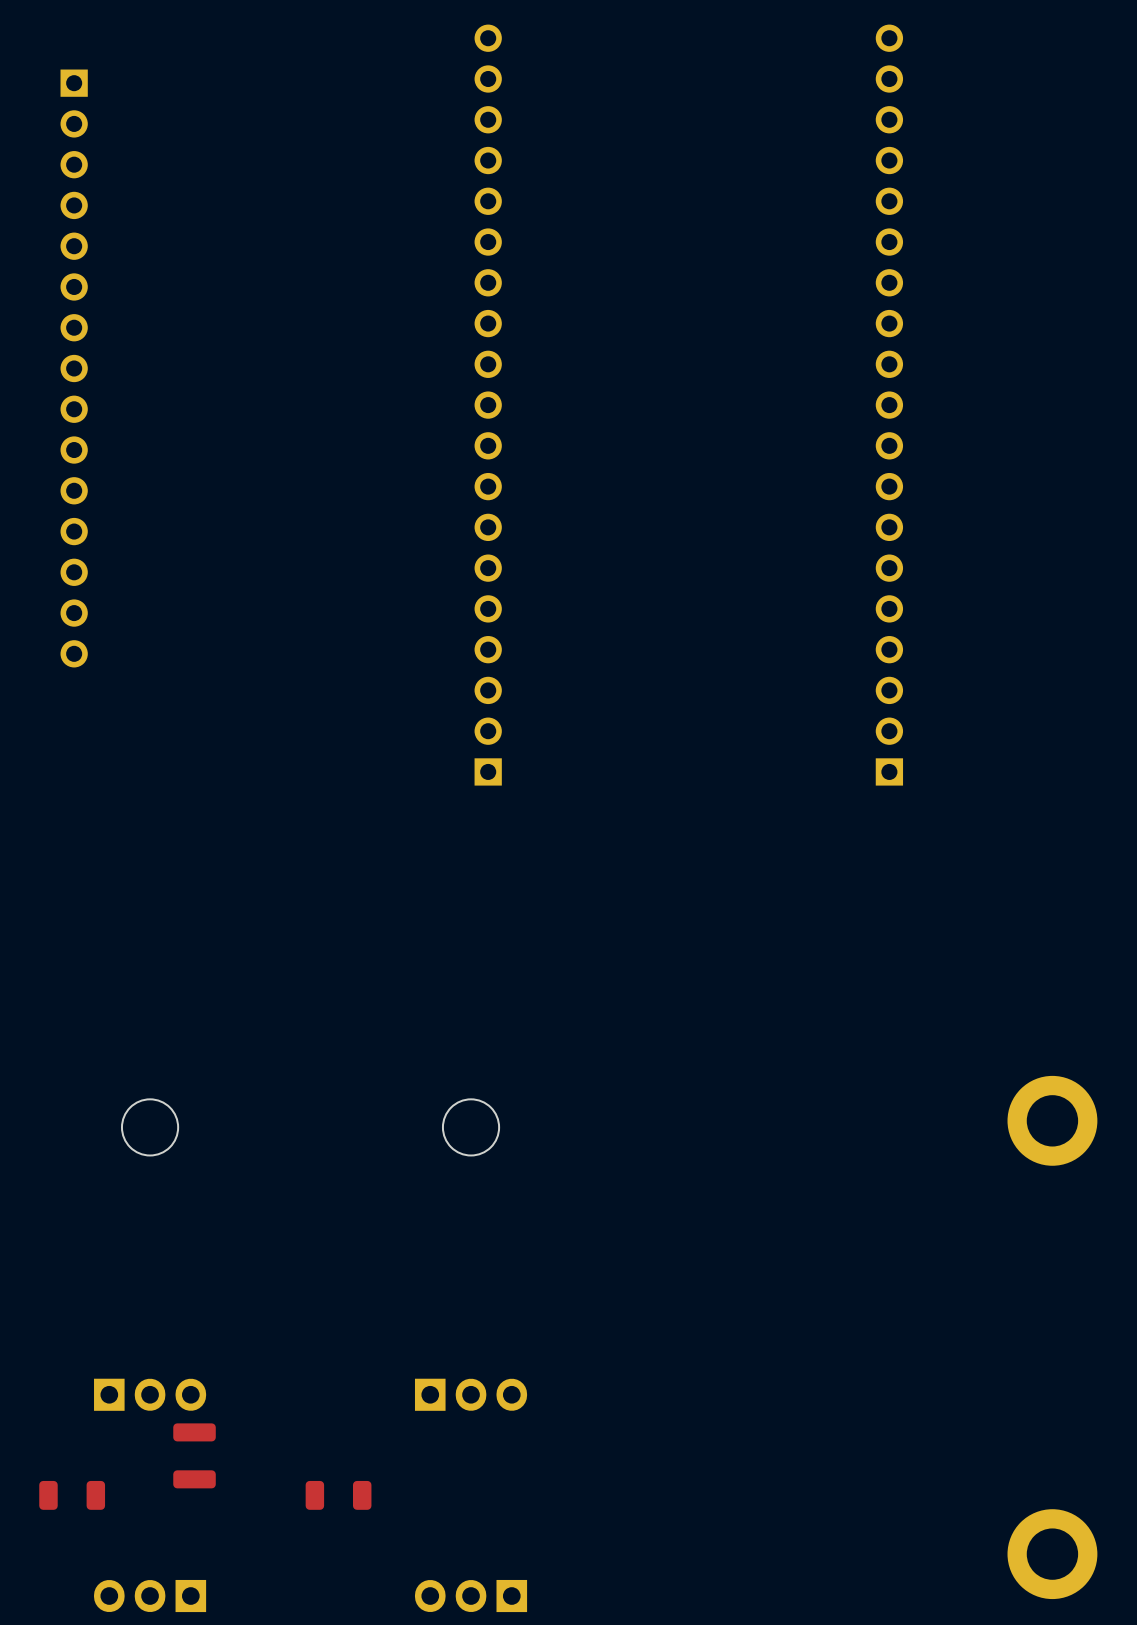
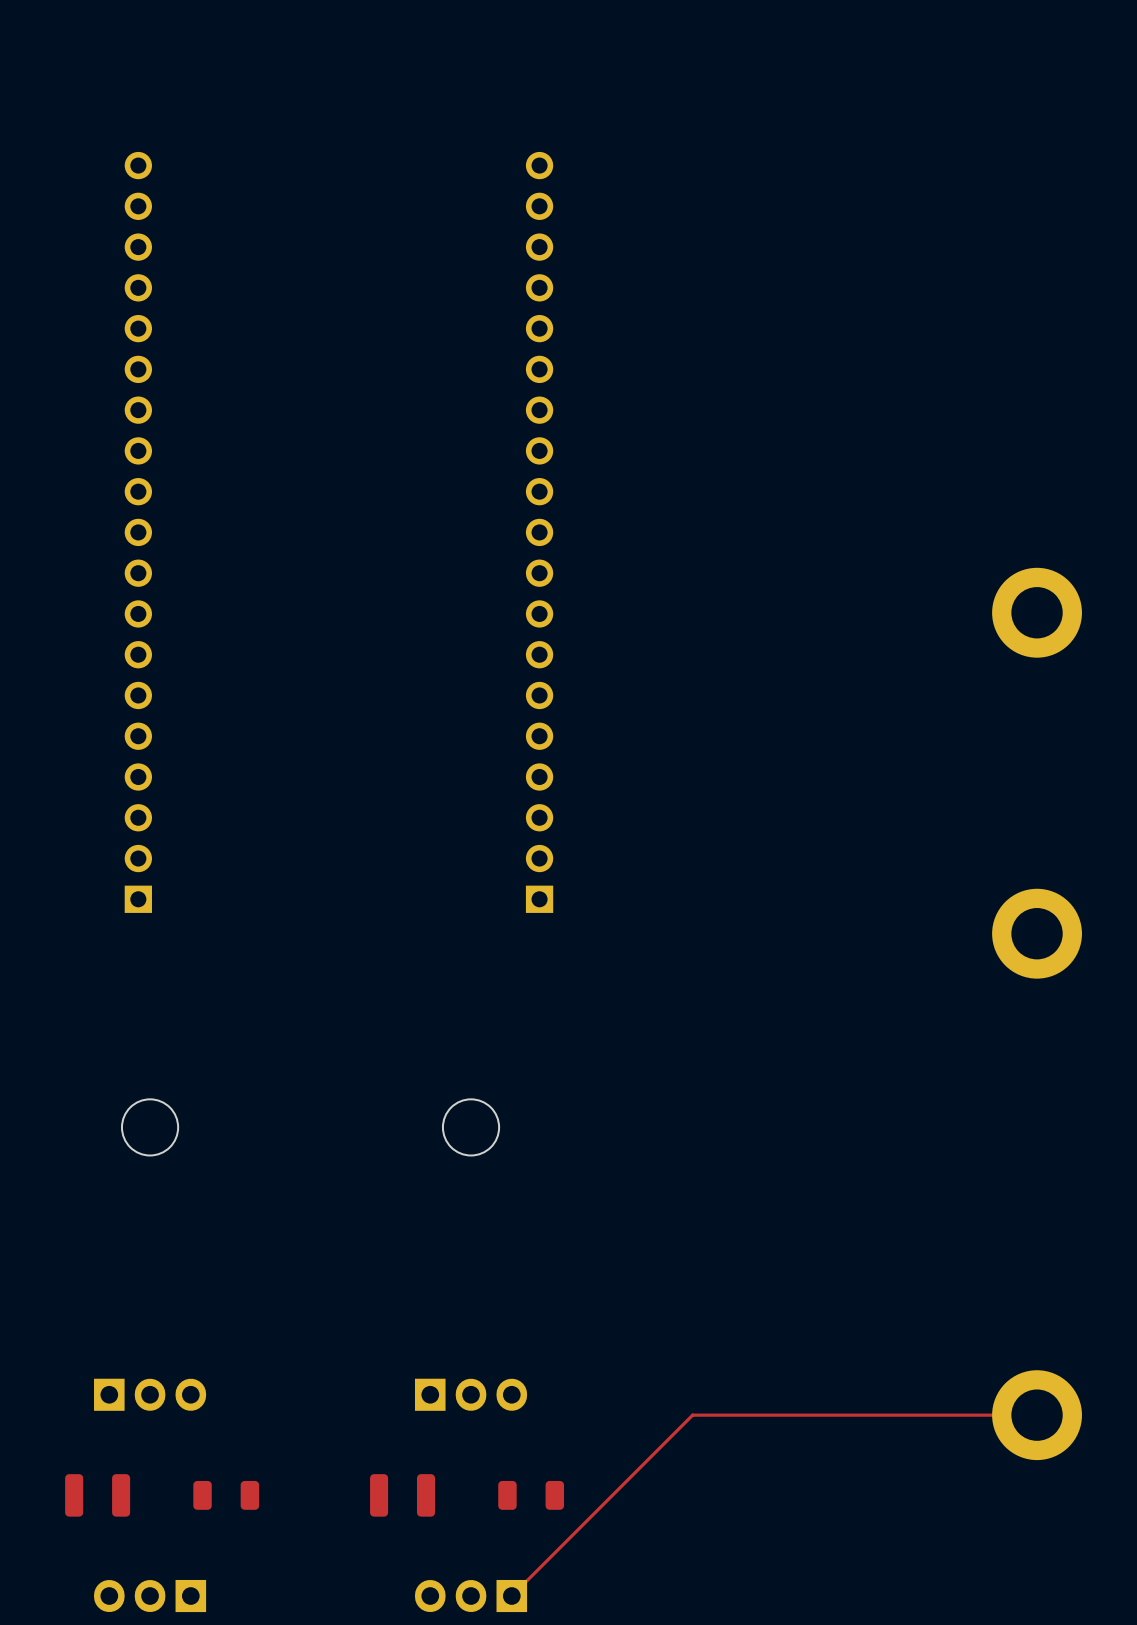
part: (74, 368) -> none
part position: (488, 405) -> (539, 532)
part: (889, 405) -> none
part: none -> (138, 532)
part: none -> (1037, 612)
part: none -> (1037, 933)
part: (1052, 1120) -> none
top track: none -> (1037, 1415) (692, 1415) (511, 1596)
part rotation: 0° (194, 1455) -> 90° clockwise (97, 1495)
part position: (194, 1455) -> (97, 1495)
part: (72, 1495) -> none
part: none -> (226, 1495)
part: (338, 1495) -> none
part: none -> (402, 1495)
part: none -> (531, 1495)
part position: (1052, 1554) -> (1037, 1415)

